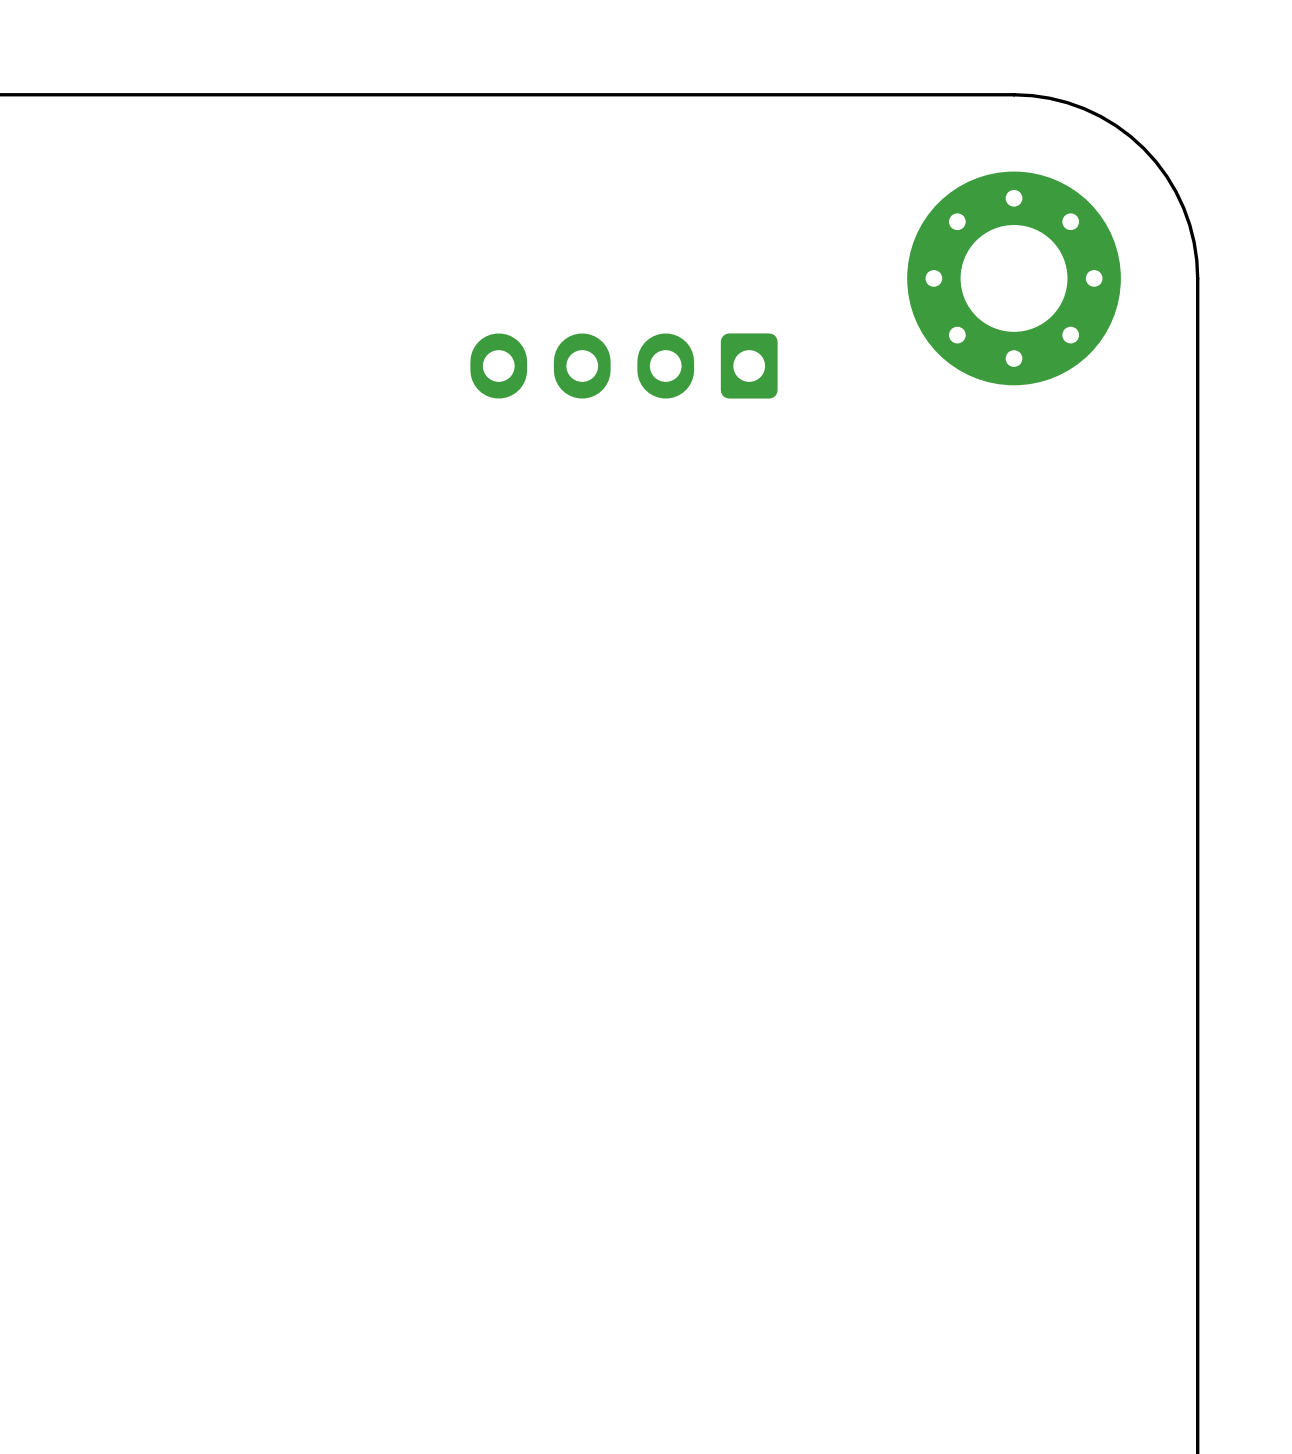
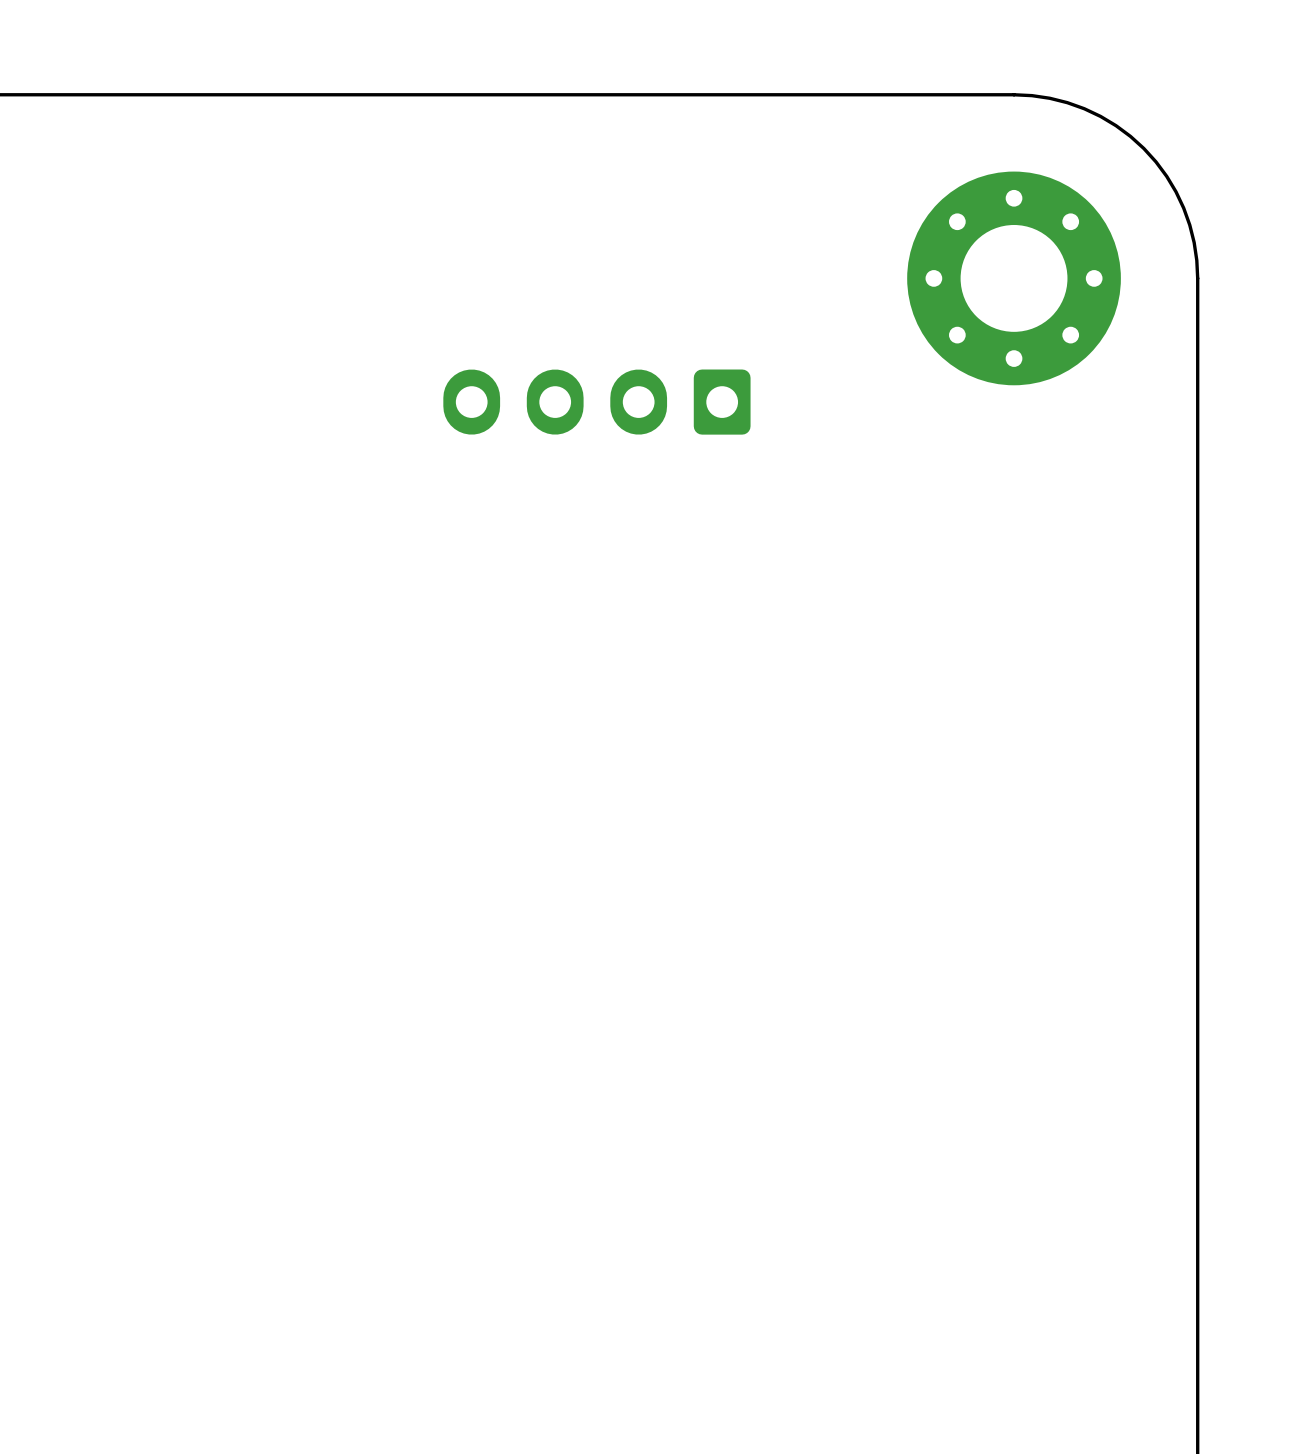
part position: (623, 366) -> (596, 402)

